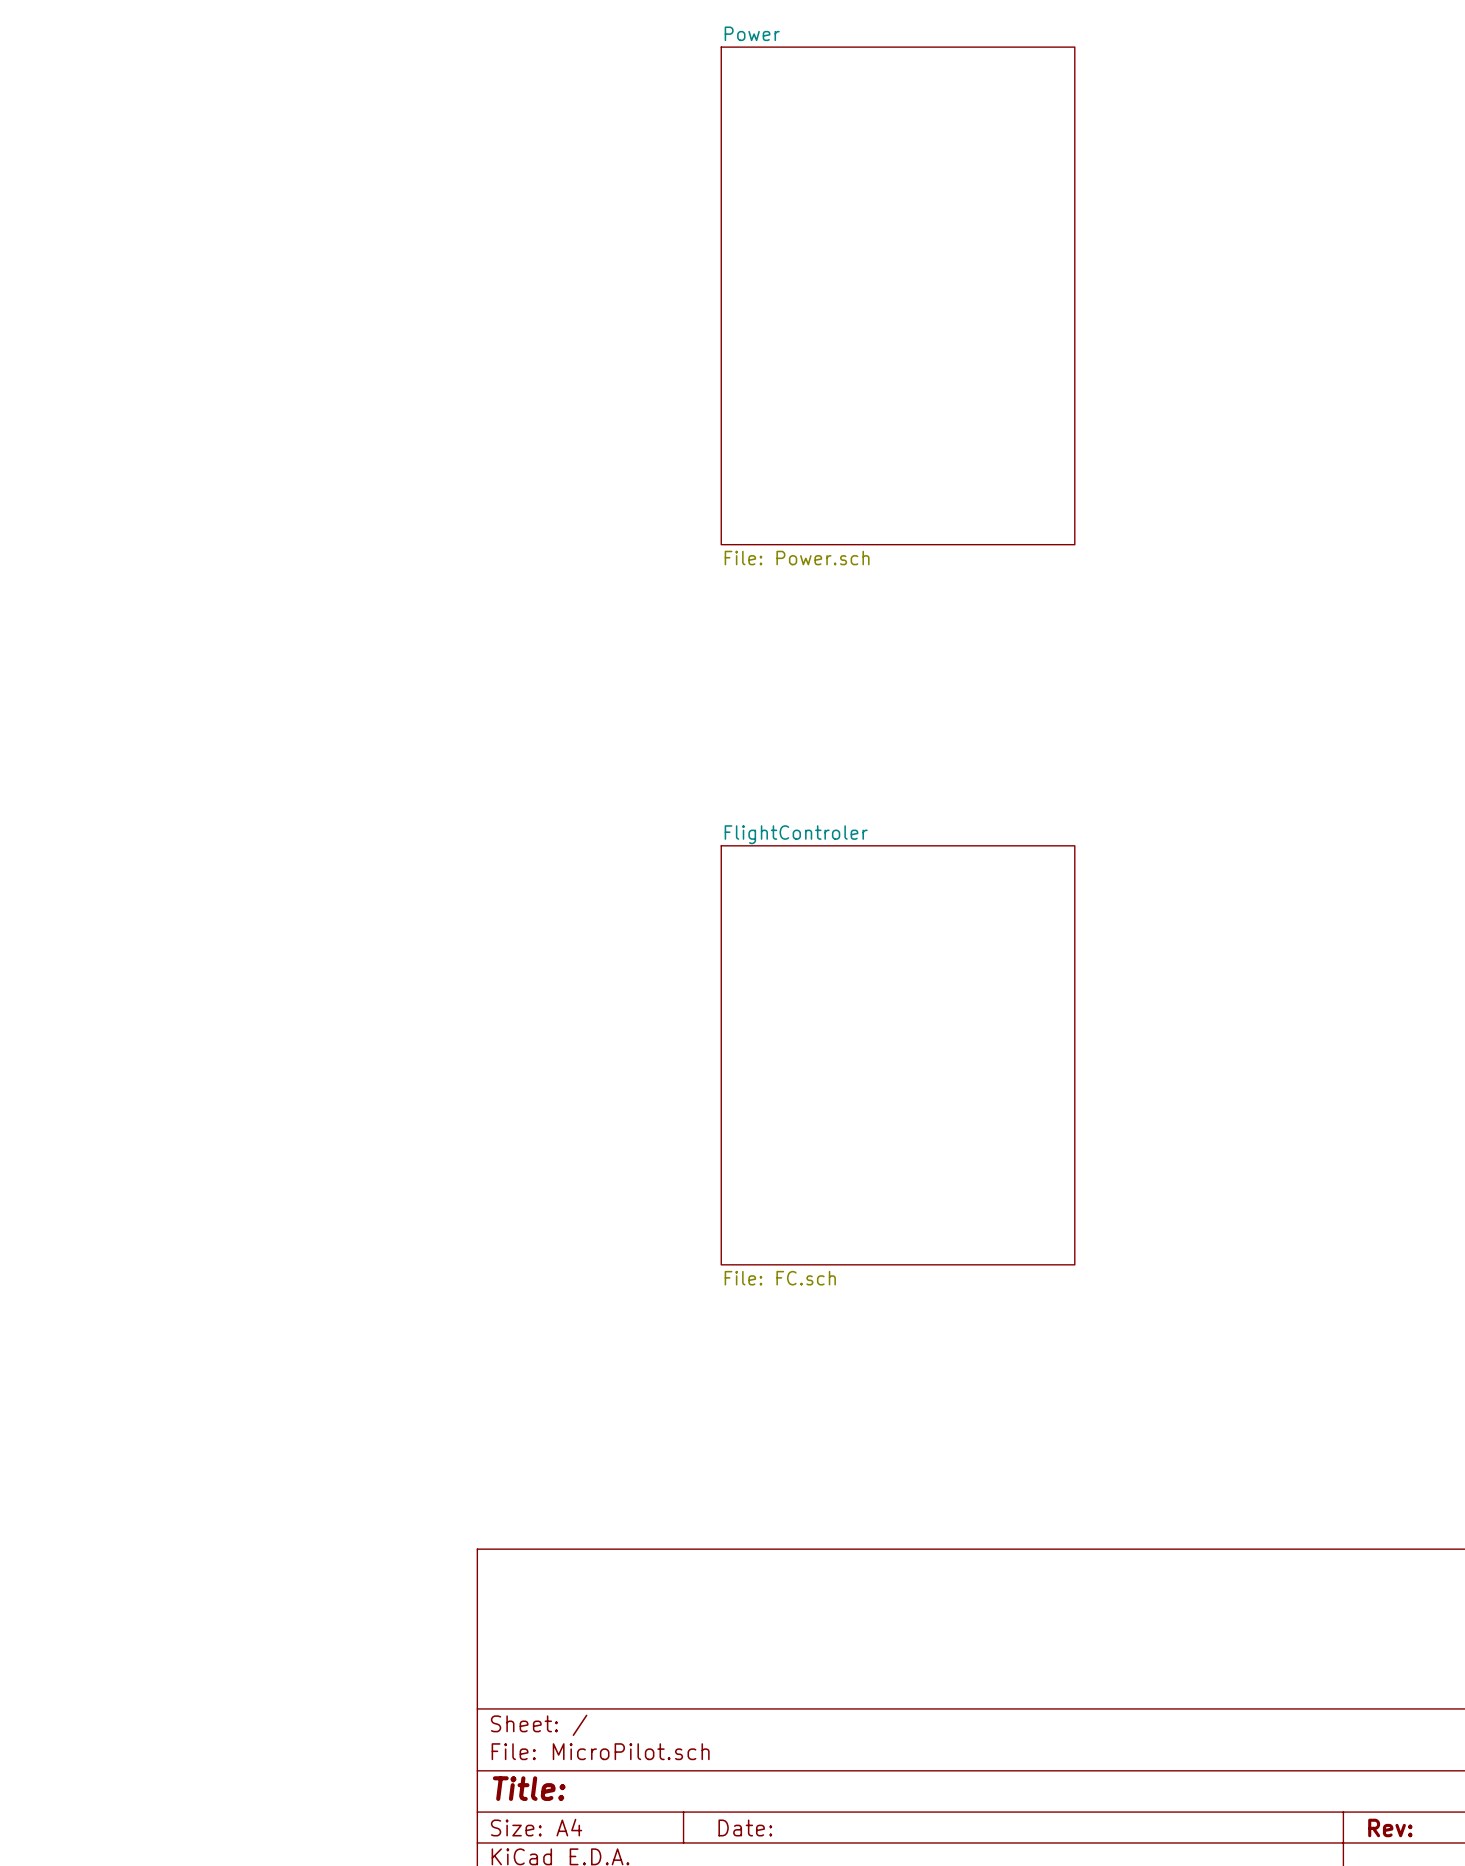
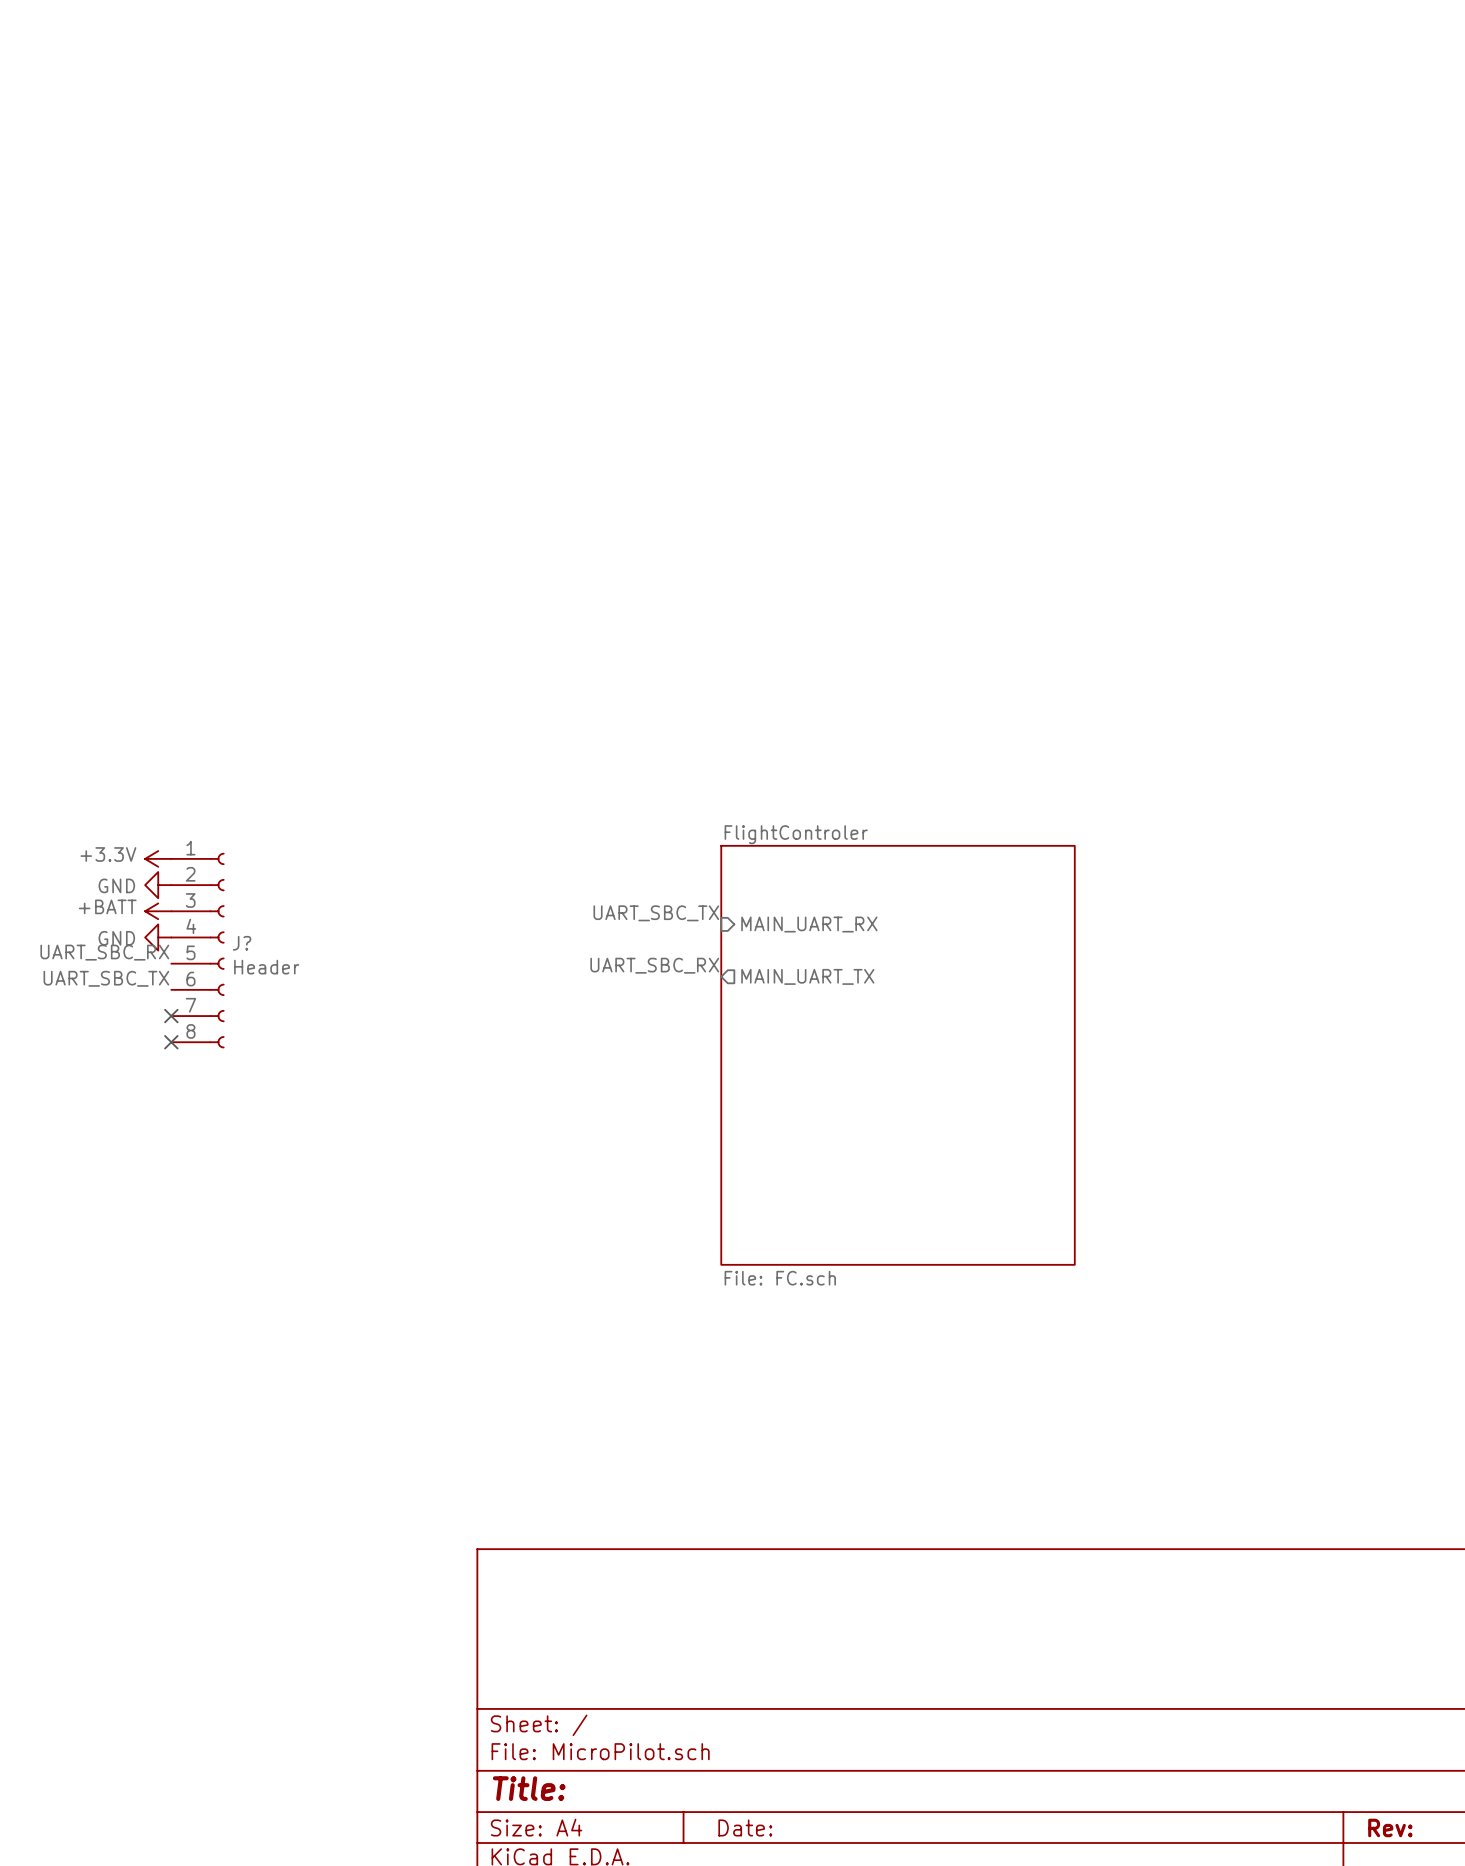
sheet Power: File: Power.sch (898, 295) -> none
power symbol: none -> +3.3V (158, 858)
power symbol: none -> GND (158, 885)
power symbol: none -> +BATT (158, 911)
label: none -> UART_SBC_TX (656, 913)
sheet pin: none -> MAIN_UART_RX (809, 924)
power symbol: none -> GND (158, 937)
J?: none -> Header (197, 950)
label: none -> UART_SBC_RX (104, 952)
label: none -> UART_SBC_RX (654, 965)
sheet pin: none -> MAIN_UART_TX (807, 976)
label: none -> UART_SBC_TX (106, 978)
no-connect mark: none -> (171, 1016)
no-connect mark: none -> (171, 1042)

